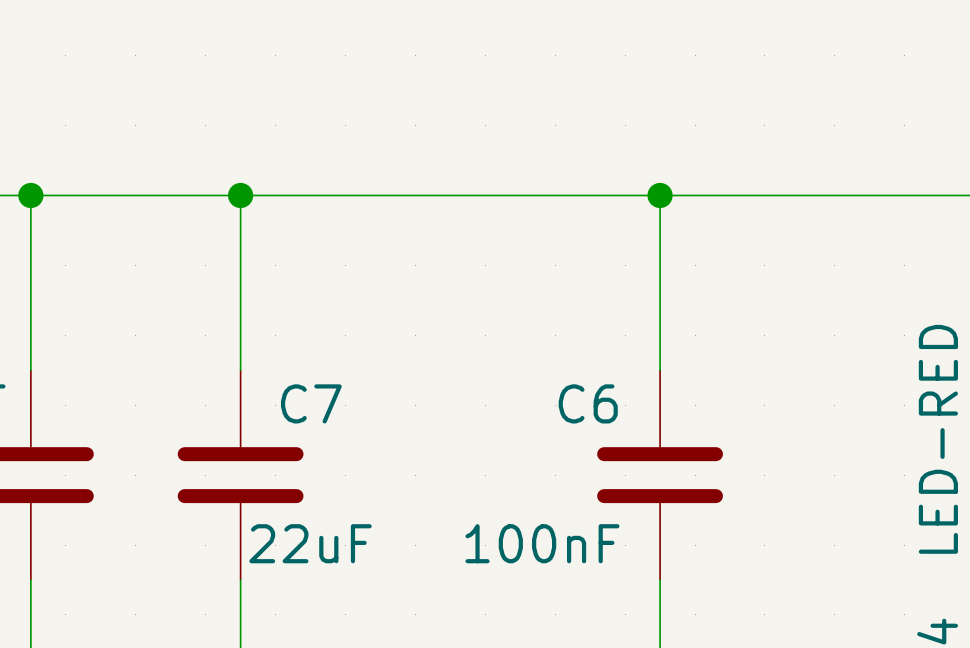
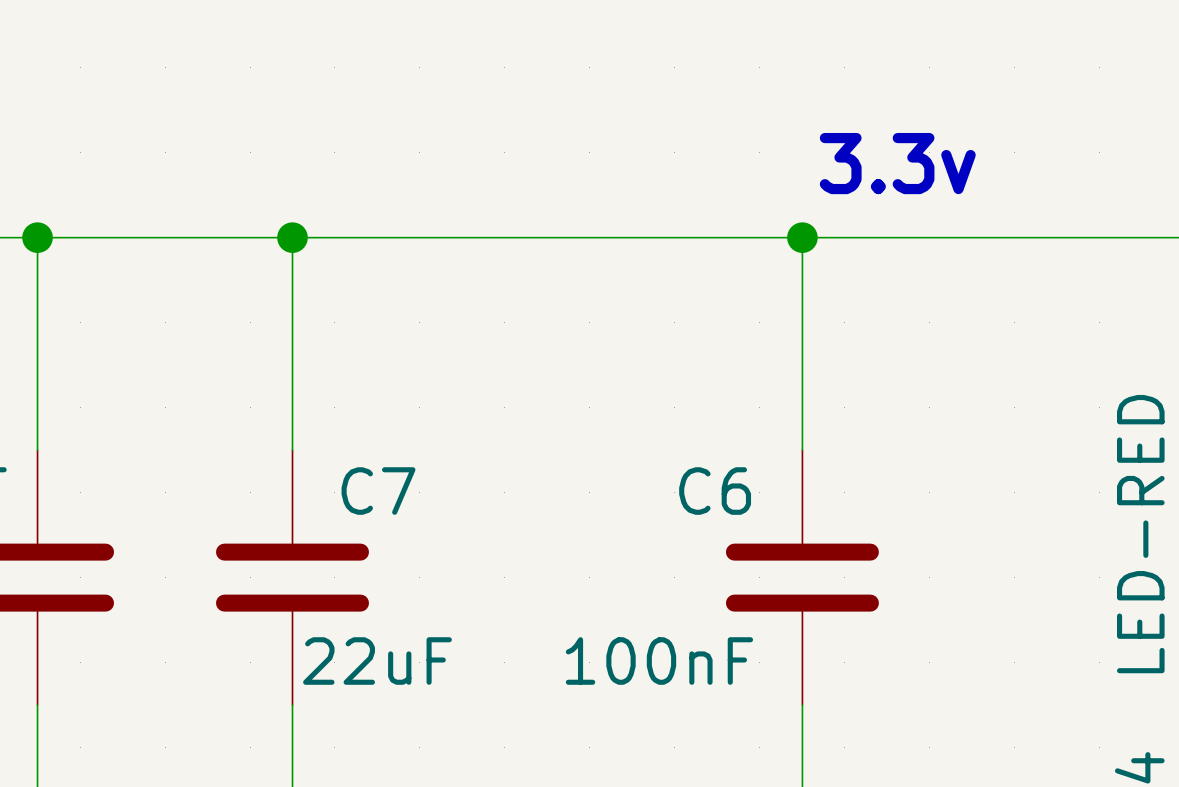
text: none -> 3.3v (897, 163)

